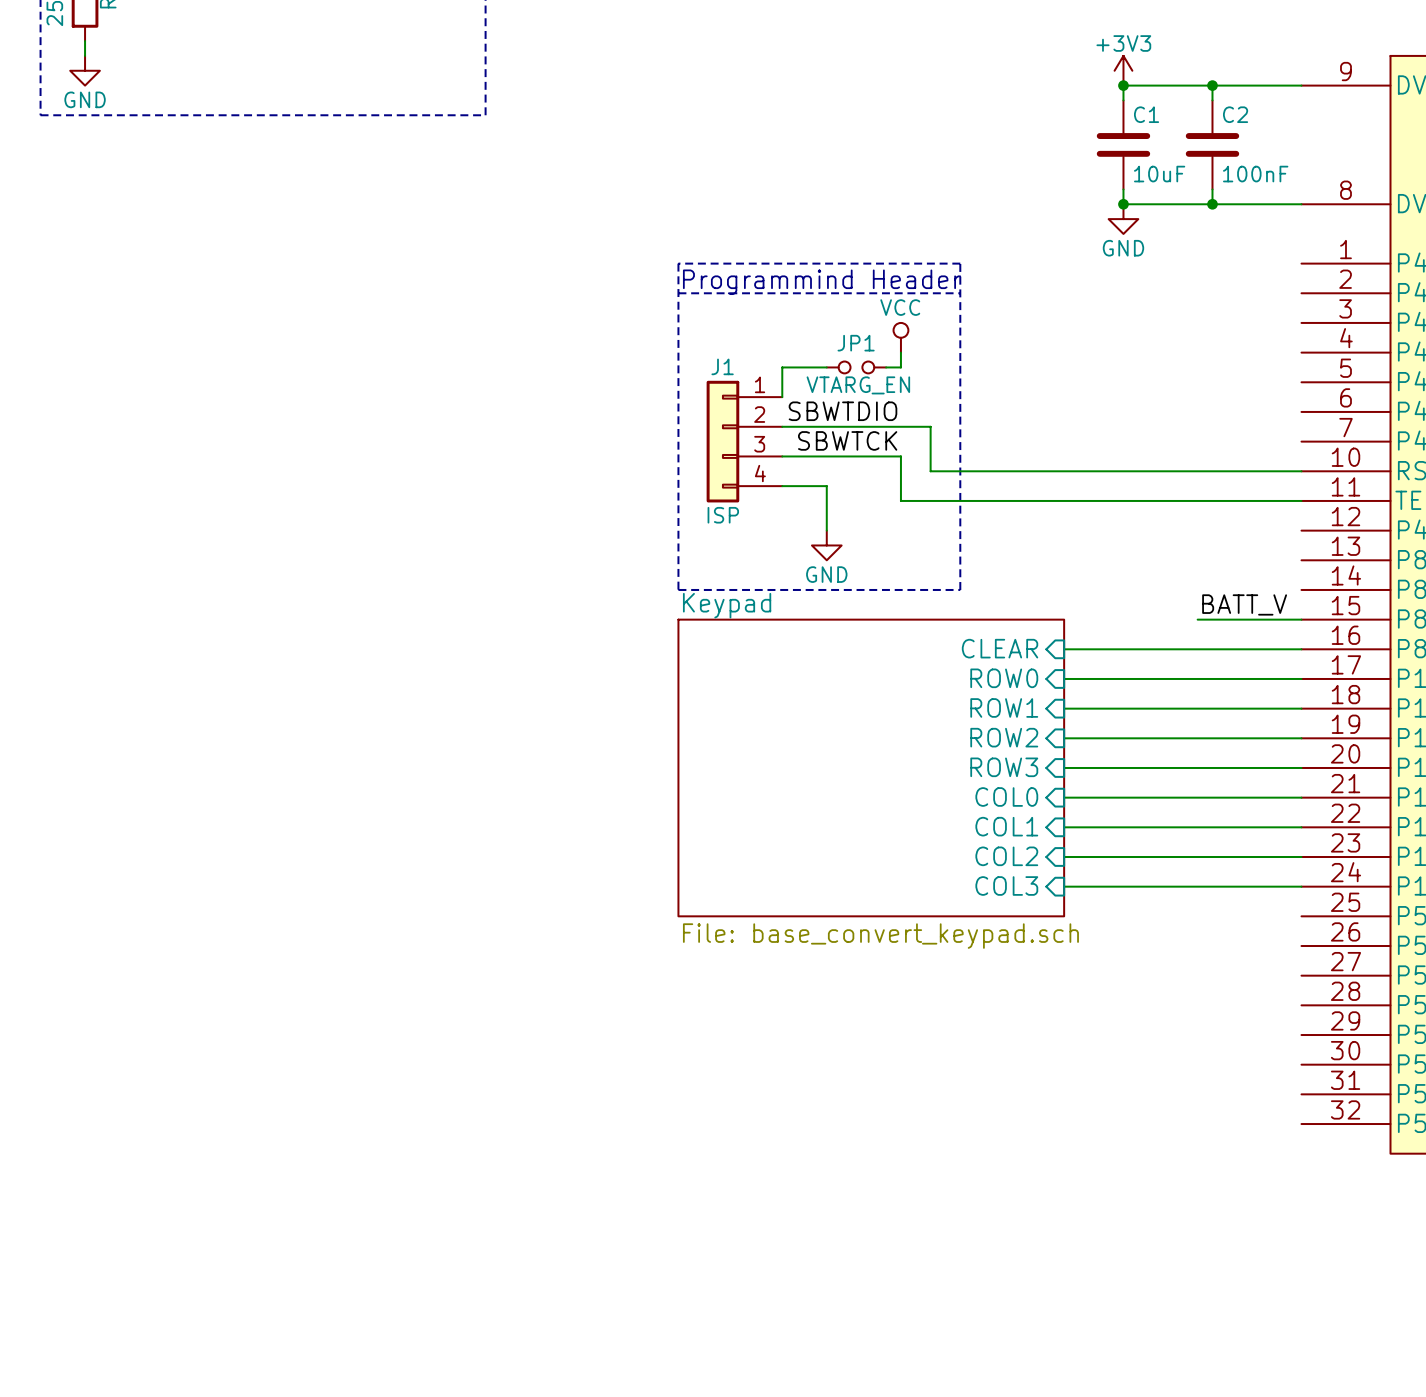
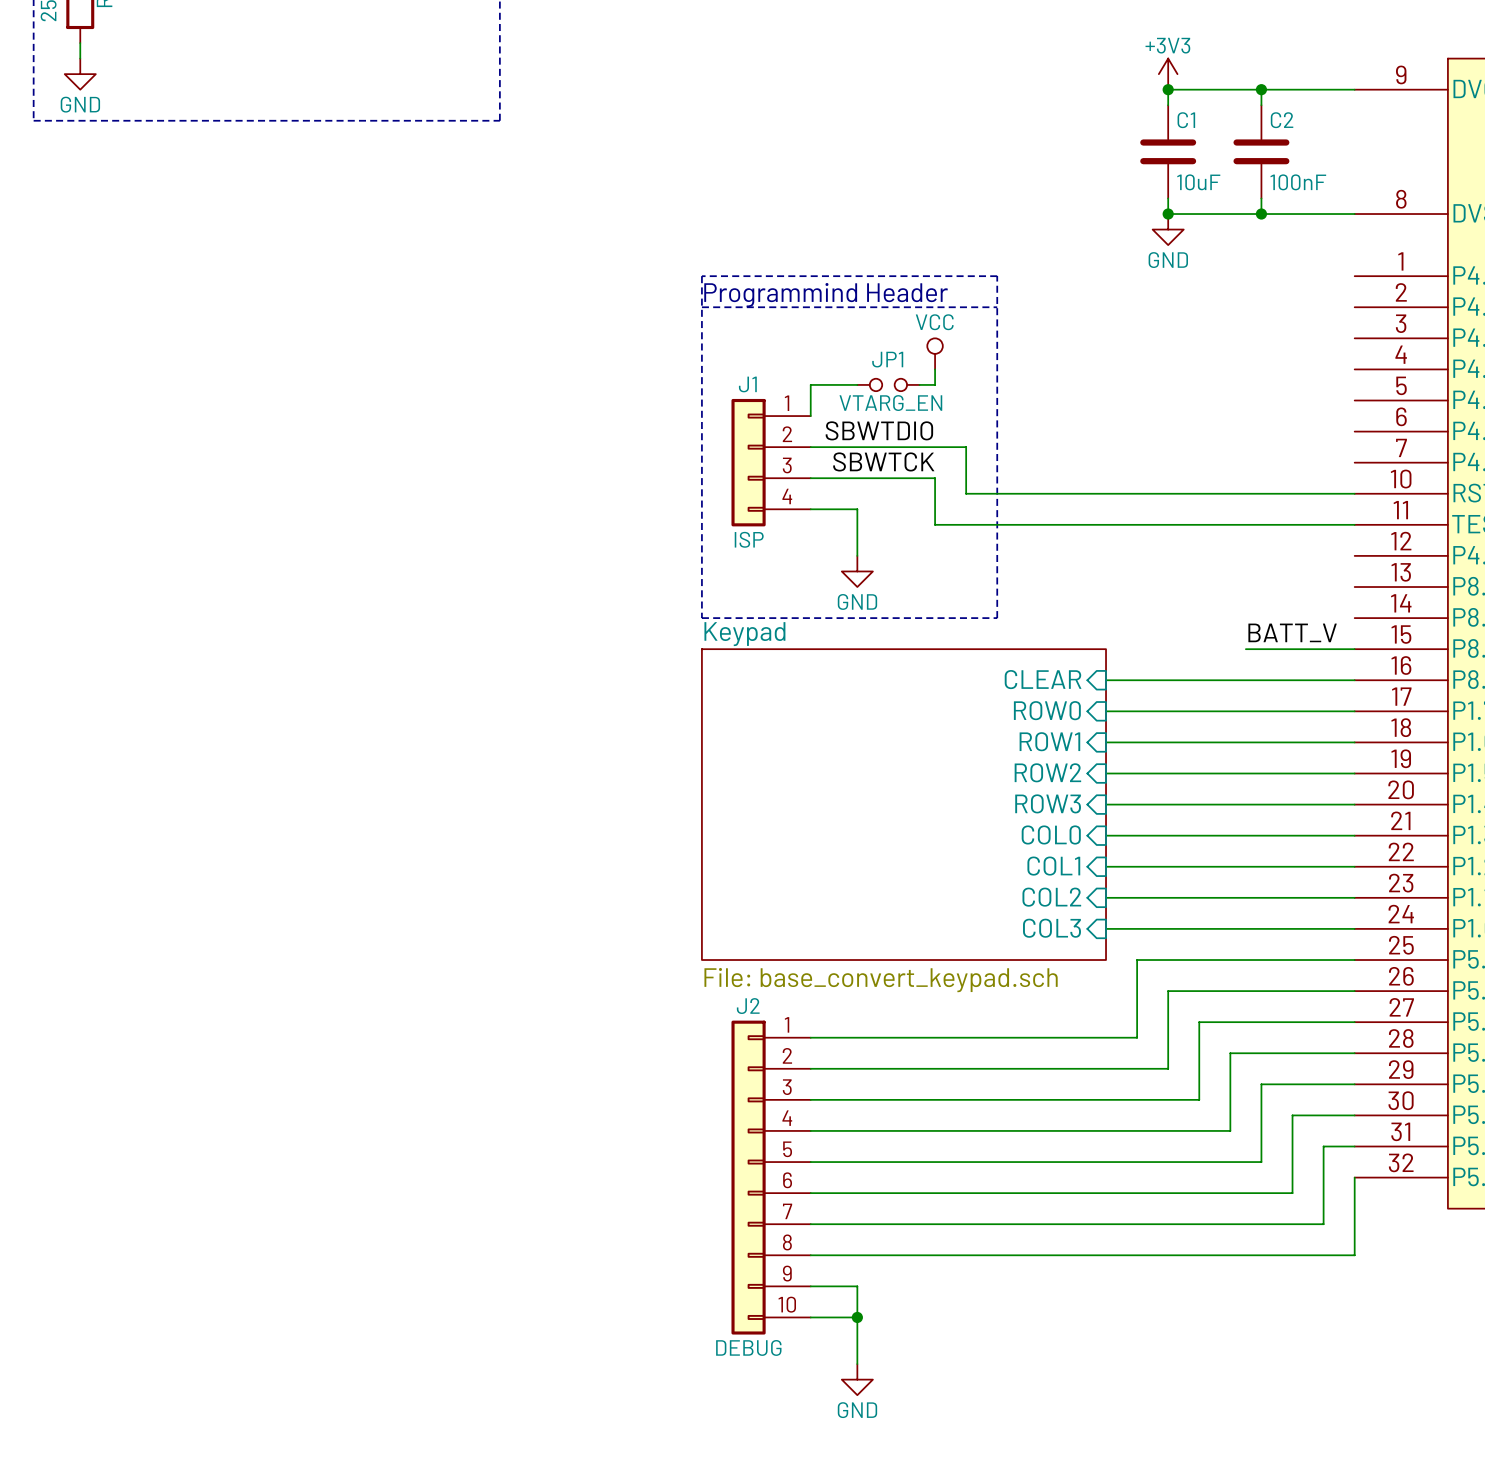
wire: none -> (1354, 960) (1137, 960) (1137, 1037) (810, 1037)
wire: none -> (1354, 991) (1168, 991) (1168, 1068) (810, 1068)
wire: none -> (1354, 1022) (1199, 1022) (1199, 1099) (810, 1099)
wire: none -> (1354, 1053) (1230, 1053) (1230, 1130) (810, 1130)
wire: none -> (1354, 1084) (1261, 1084) (1261, 1162) (810, 1162)
wire: none -> (1354, 1115) (1292, 1115) (1292, 1193) (810, 1193)
wire: none -> (1354, 1146) (1323, 1146) (1323, 1224) (810, 1224)
J2: none -> DEBUG (771, 1177)
wire: none -> (1354, 1177) (1354, 1255) (810, 1255)
wire: none -> (810, 1286) (857, 1286) (857, 1364)
wire: none -> (810, 1317) (857, 1317)
junction: none -> (857, 1317)
power symbol: none -> GND (857, 1379)

